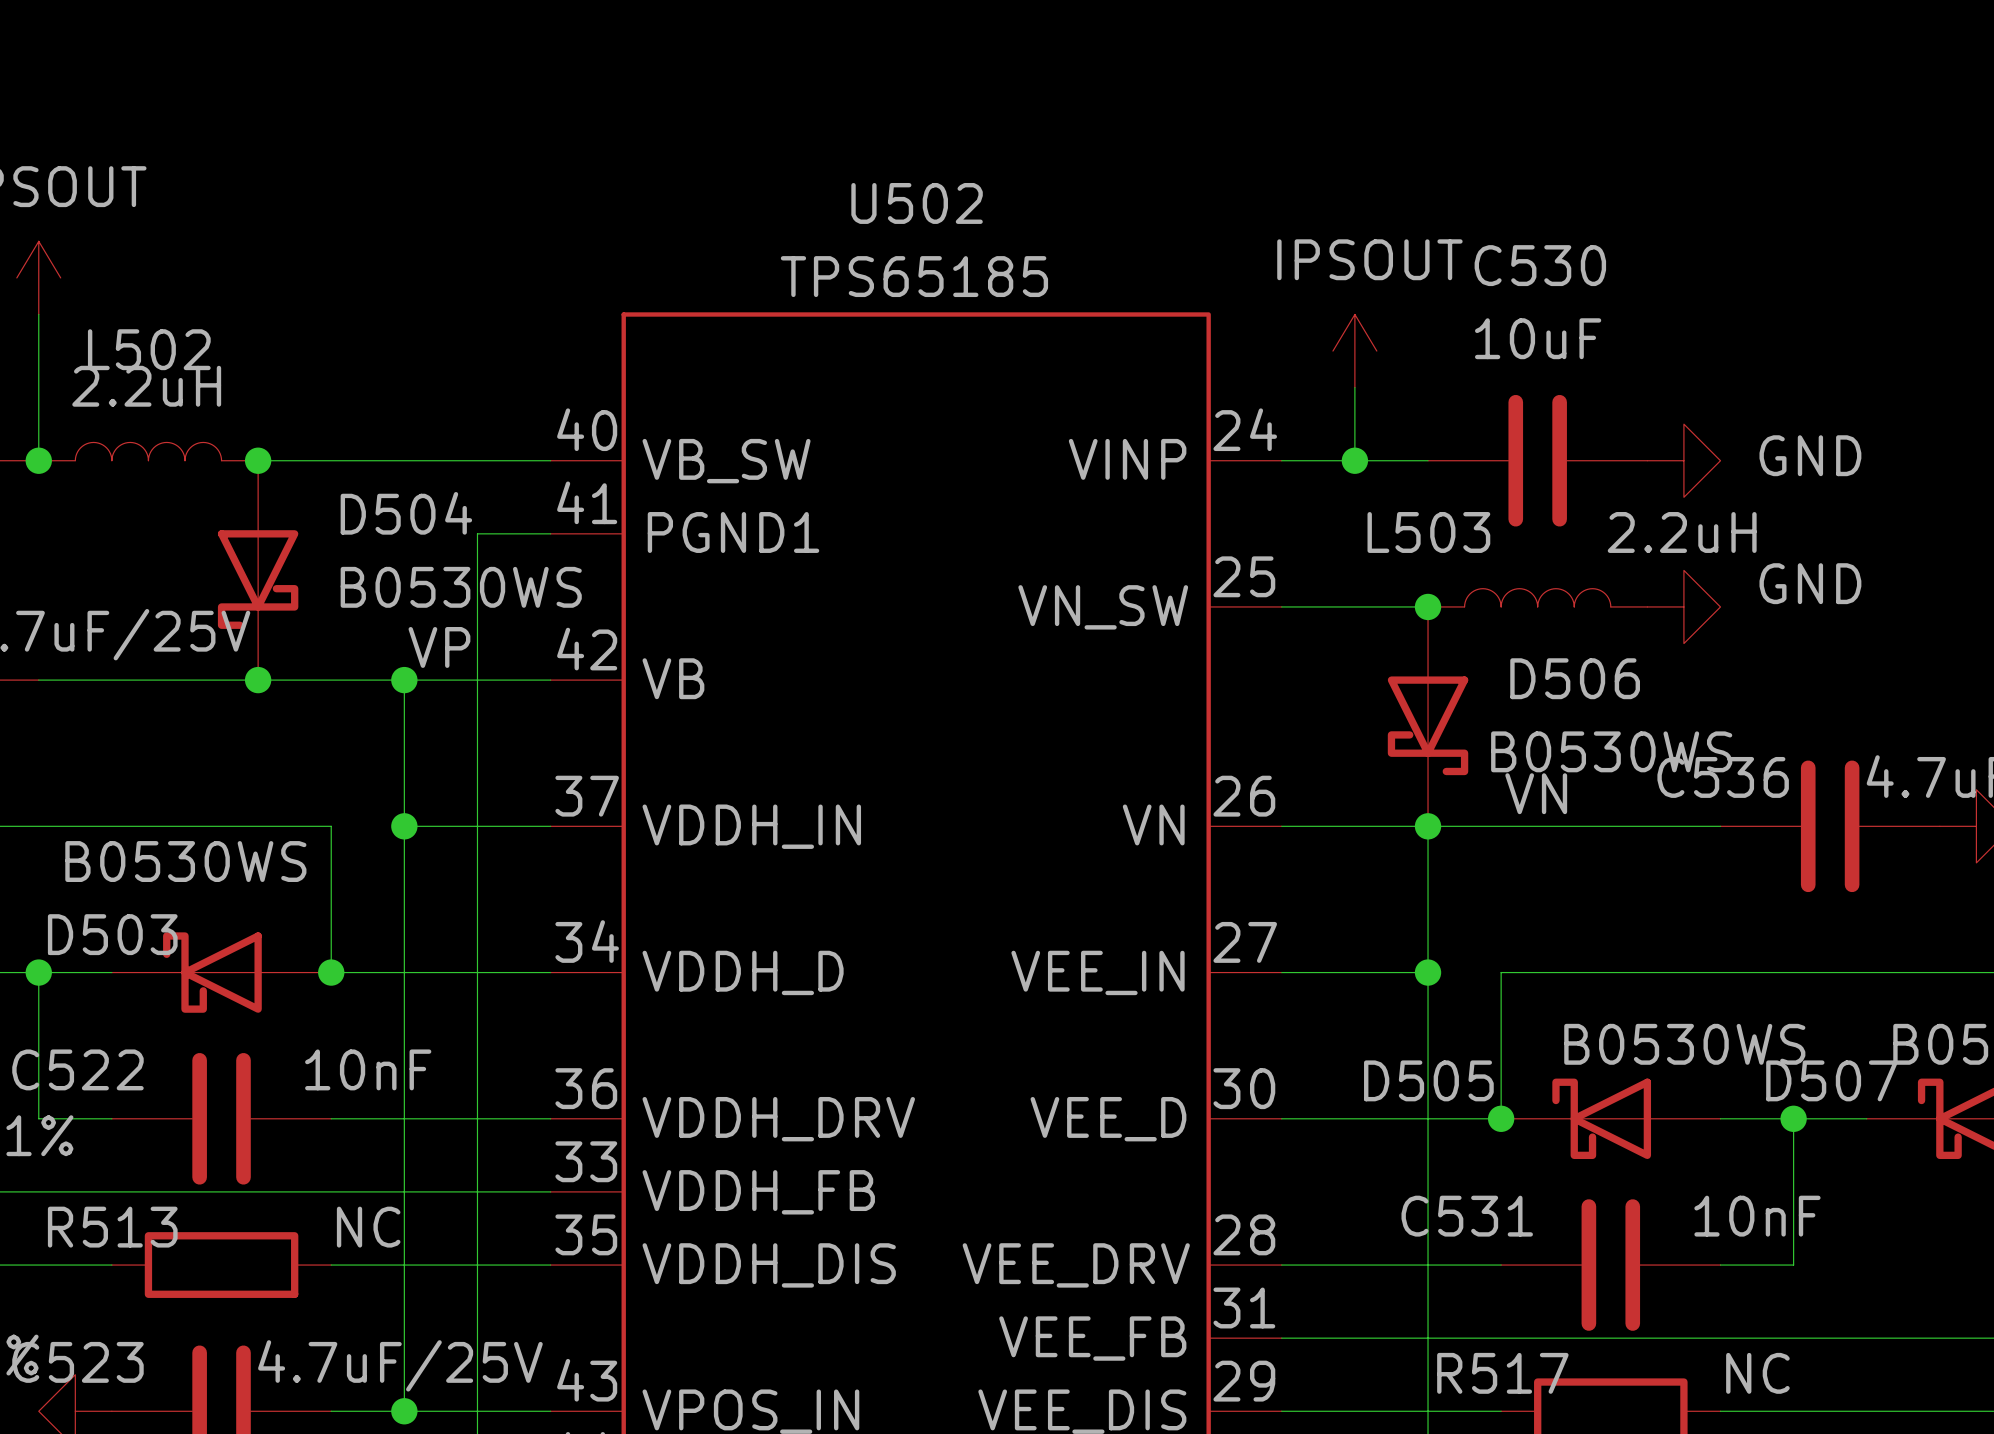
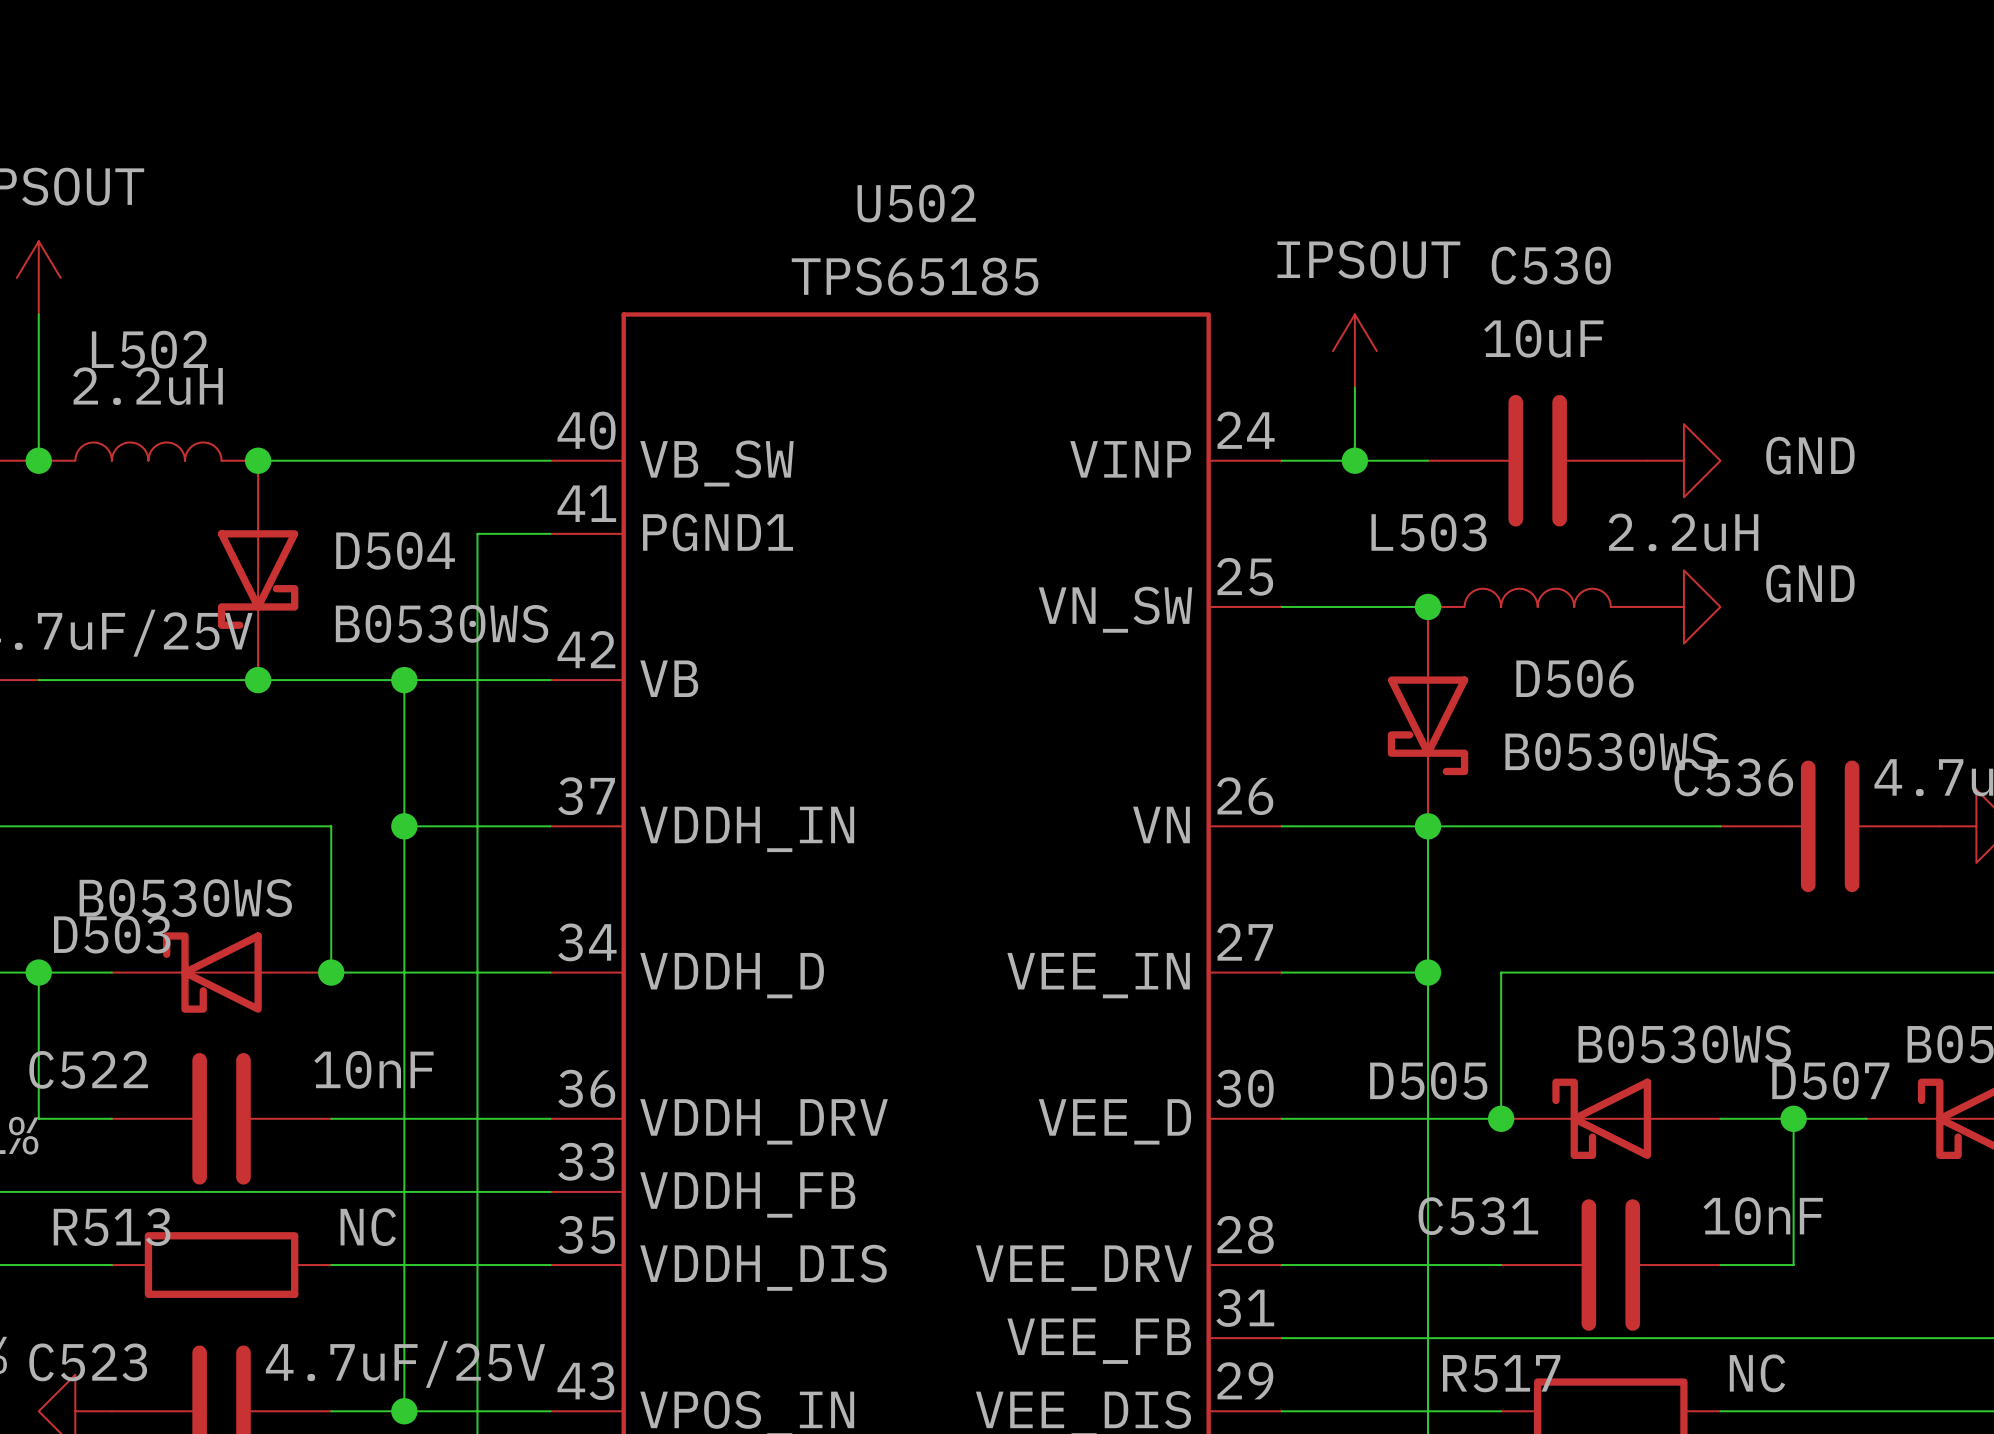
D504 name position: D504 (406, 513) -> D504 (395, 550)
D504 value position: B0530WS (461, 587) -> B0530WS (442, 623)
label: VP (439, 647) -> none
label: VN (1536, 793) -> none
D503 value position: B0530WS (185, 861) -> B0530WS (185, 898)

